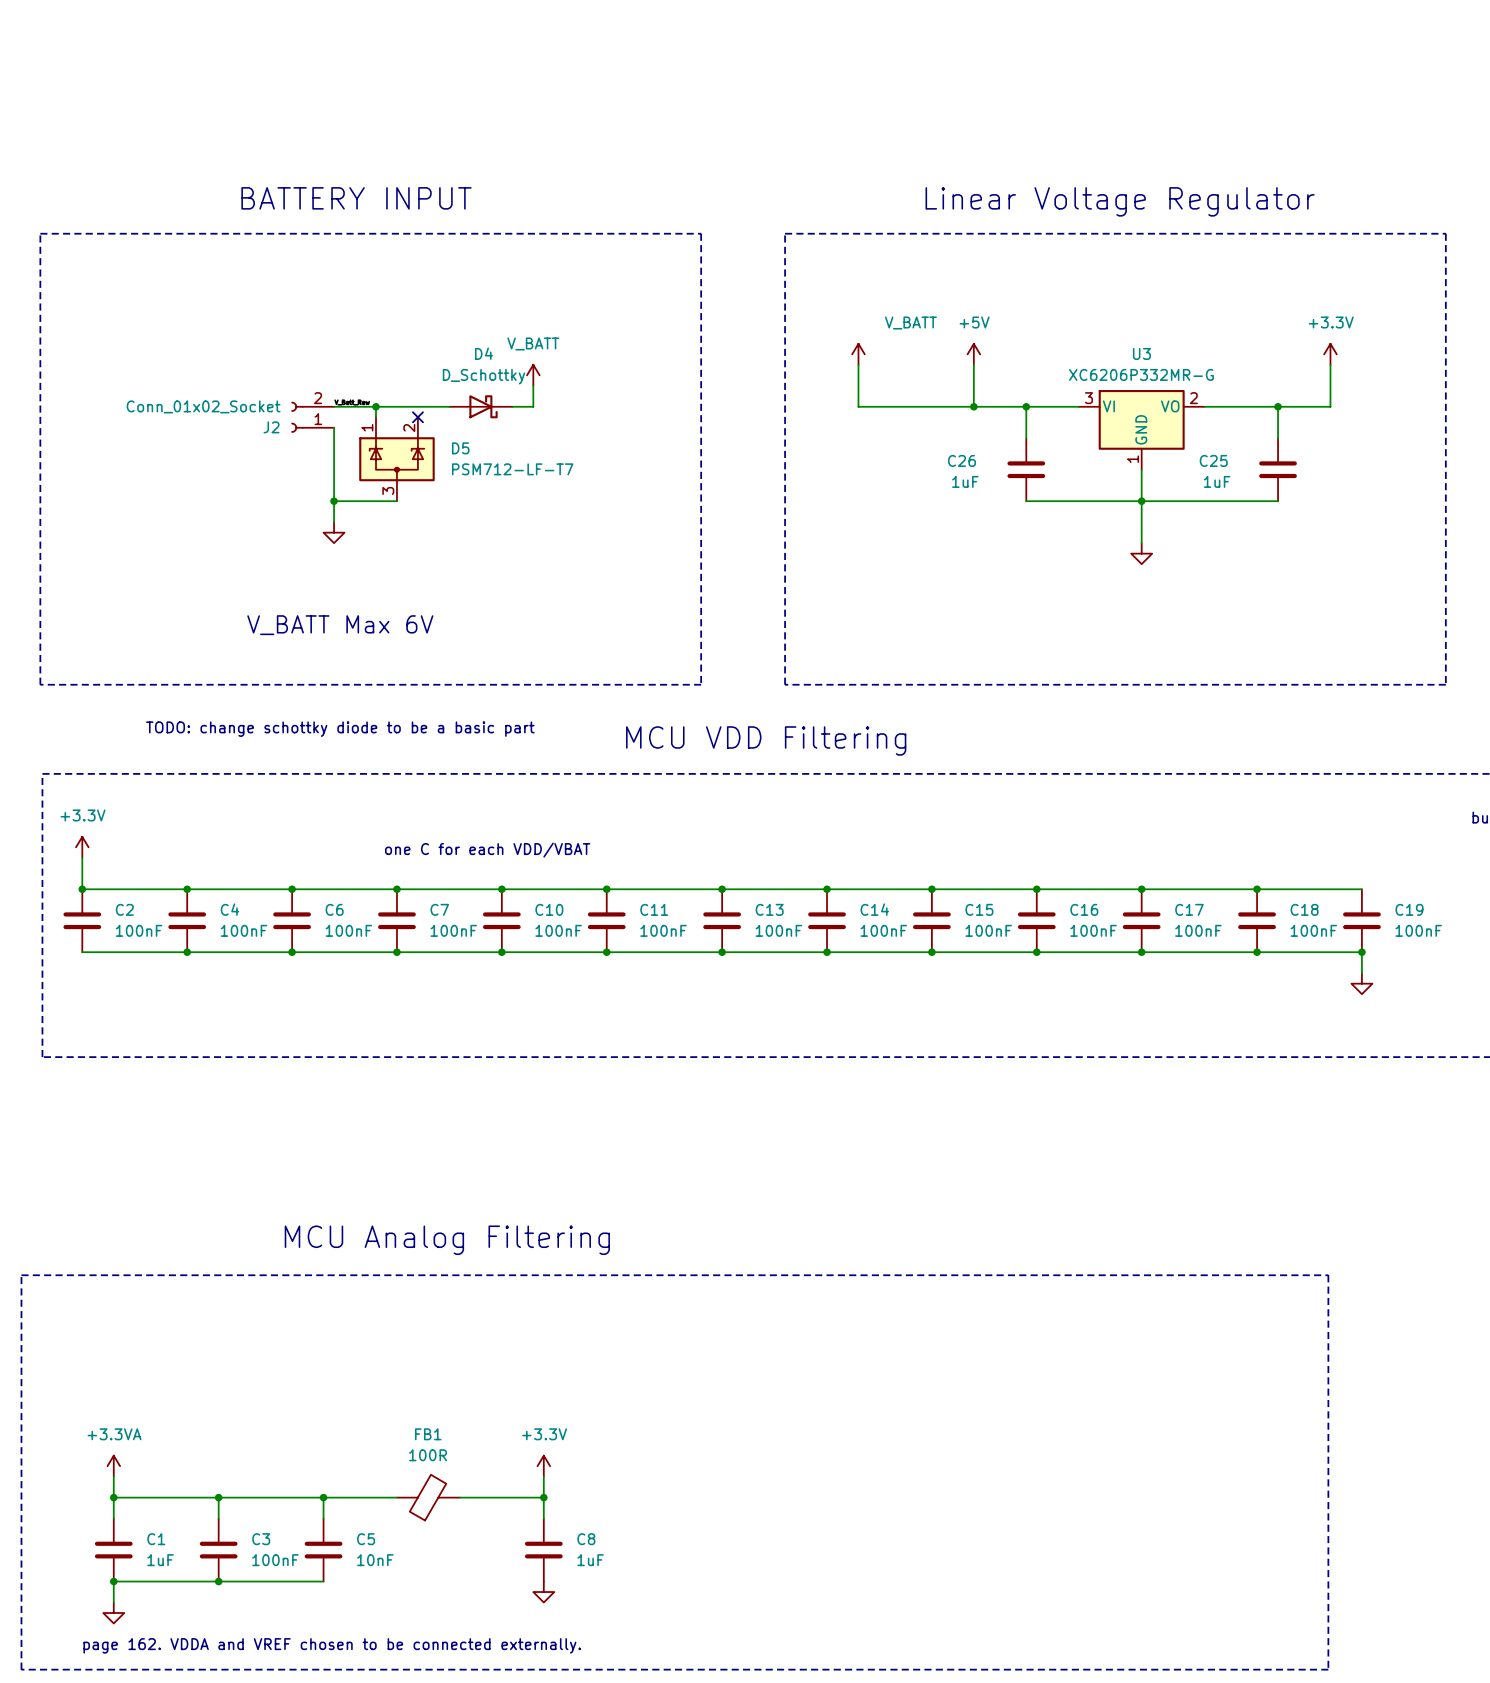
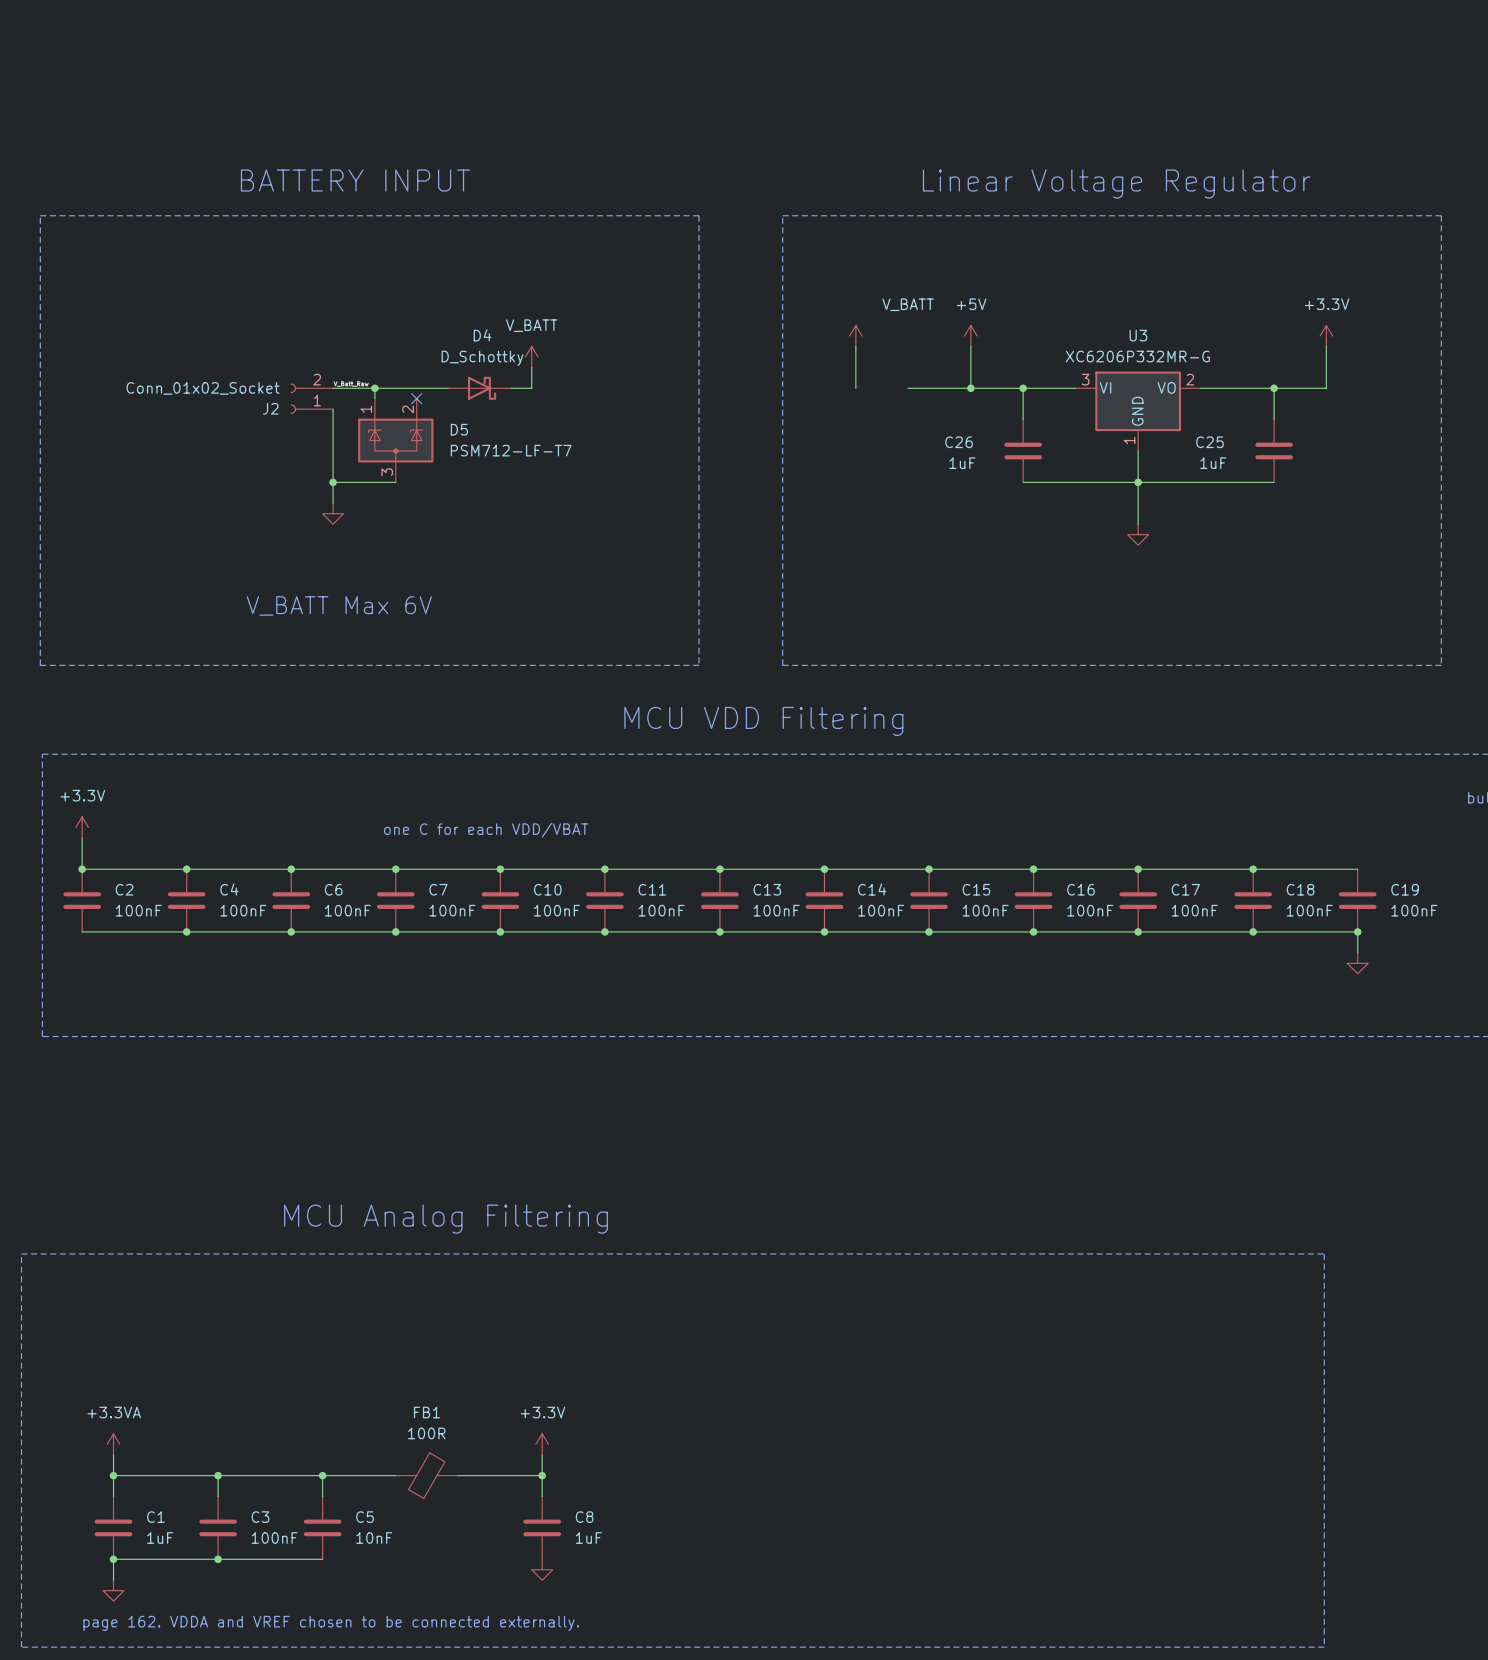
wire: (858, 406) (910, 406) -> none
text: TODO: change schottky diode to be a basic part (340, 729) -> none

